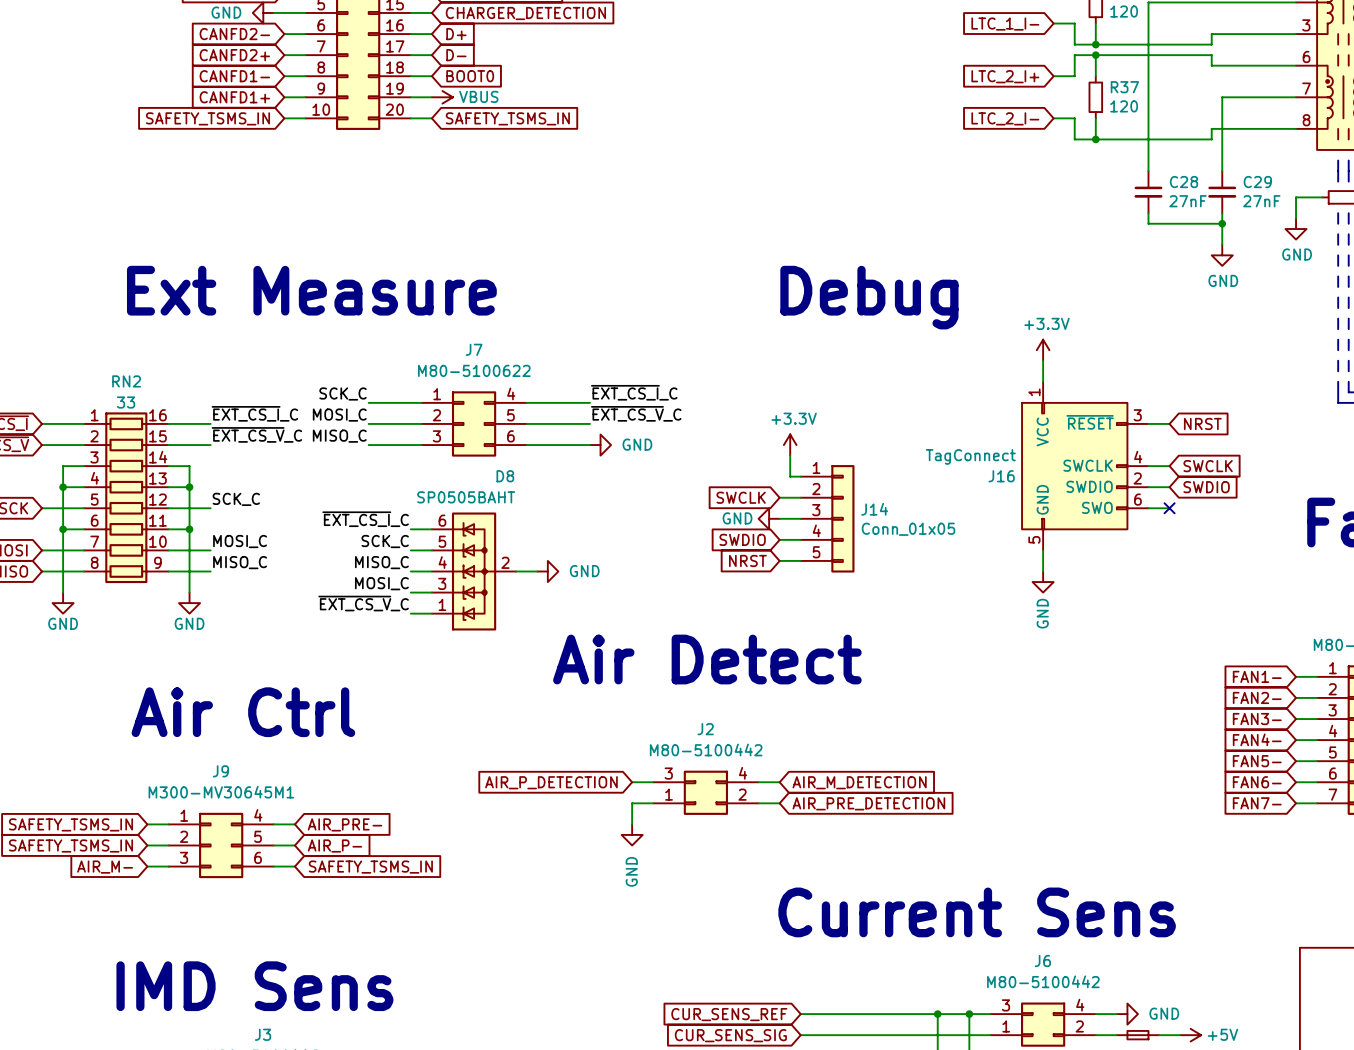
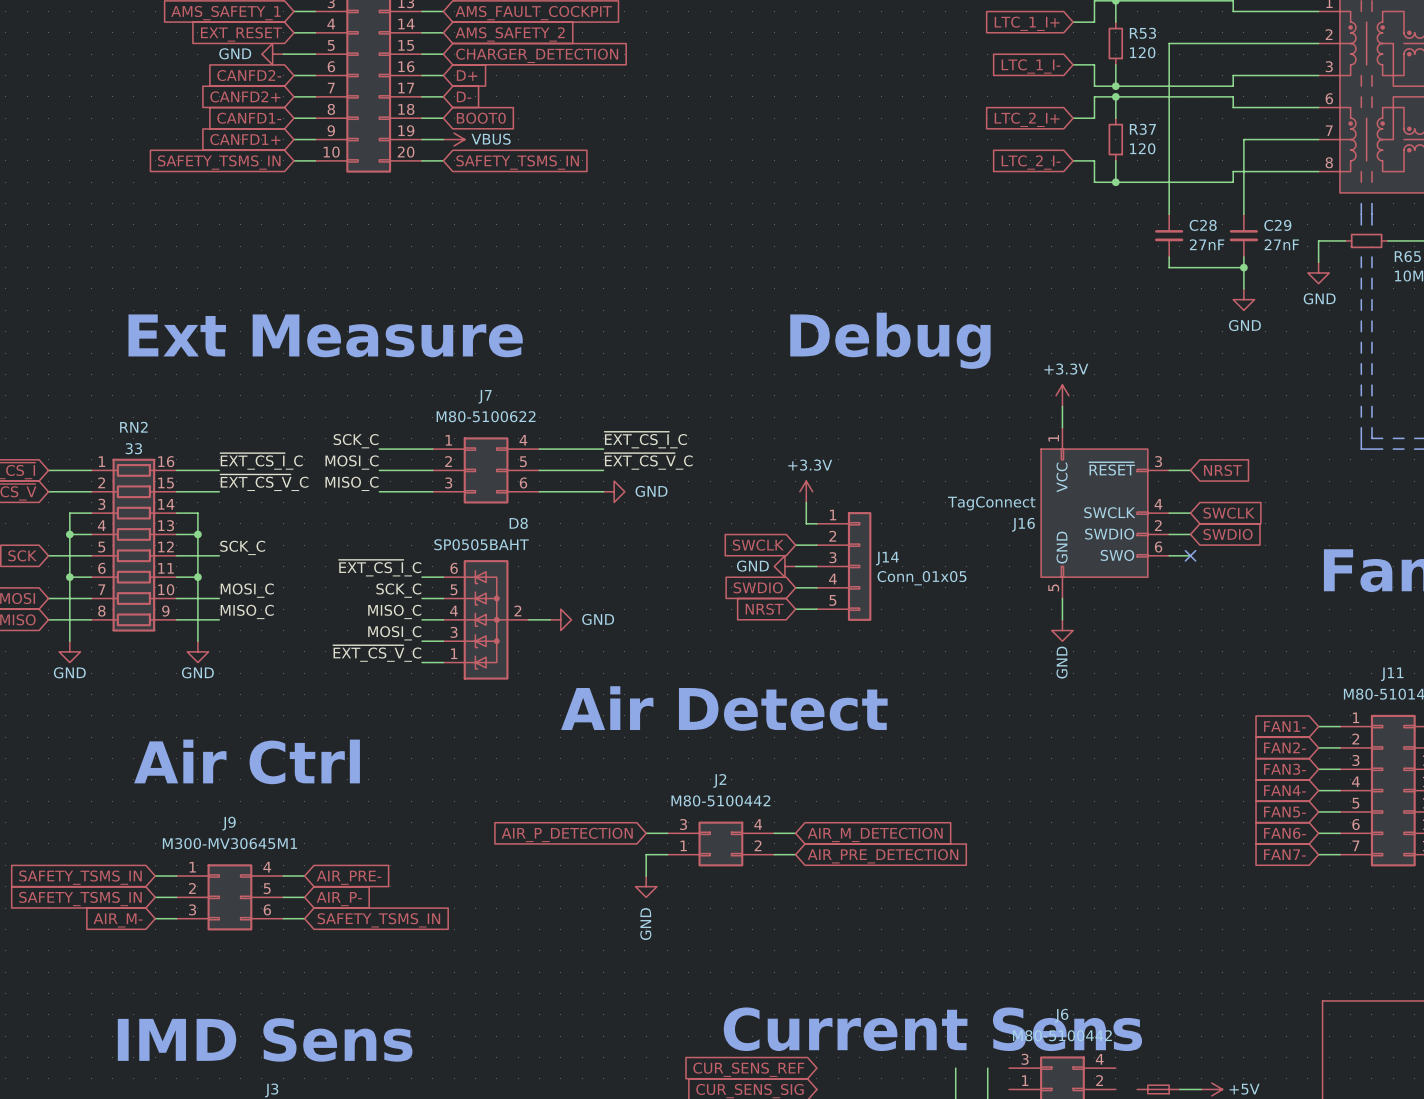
text position: Current Sens (977, 912) -> Current Sens (932, 1029)
wire: (800, 1014) (990, 1014) -> none
junction: (937, 1014) -> none
junction: (969, 1014) -> none
wire: (1095, 1014) (1116, 1014) -> none
power symbol: GND (1127, 1014) -> none
wire: (800, 1035) (990, 1035) -> none
wire: (1095, 1035) (1116, 1035) -> none

